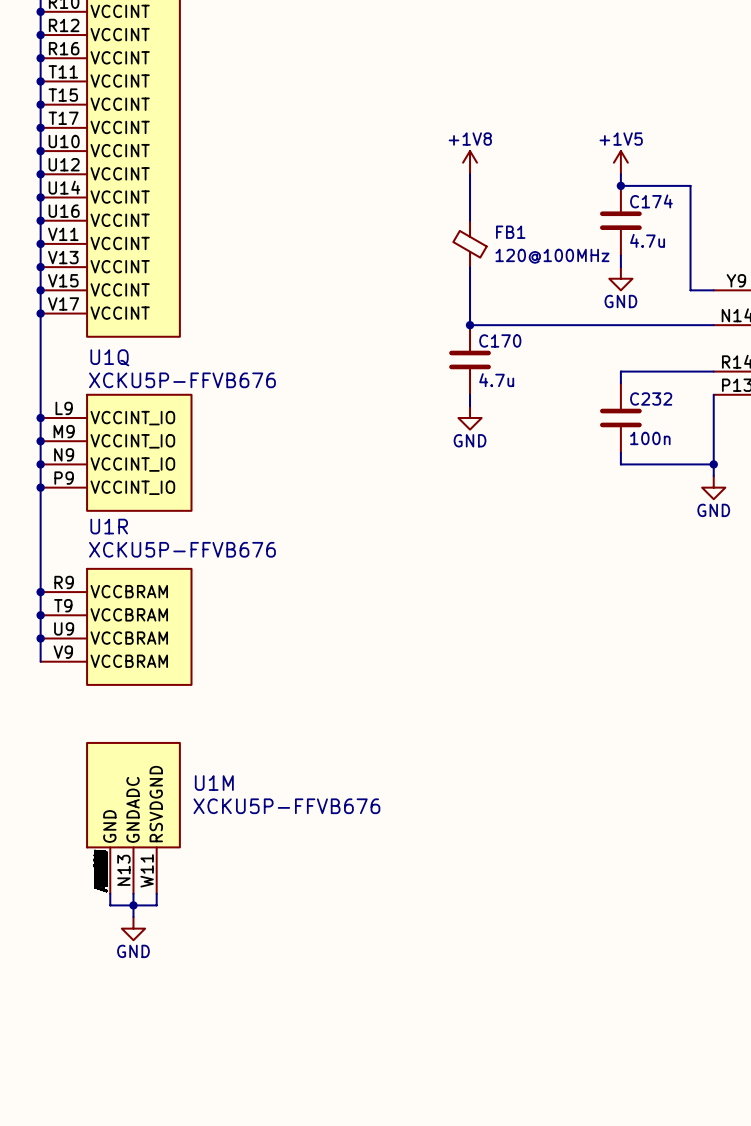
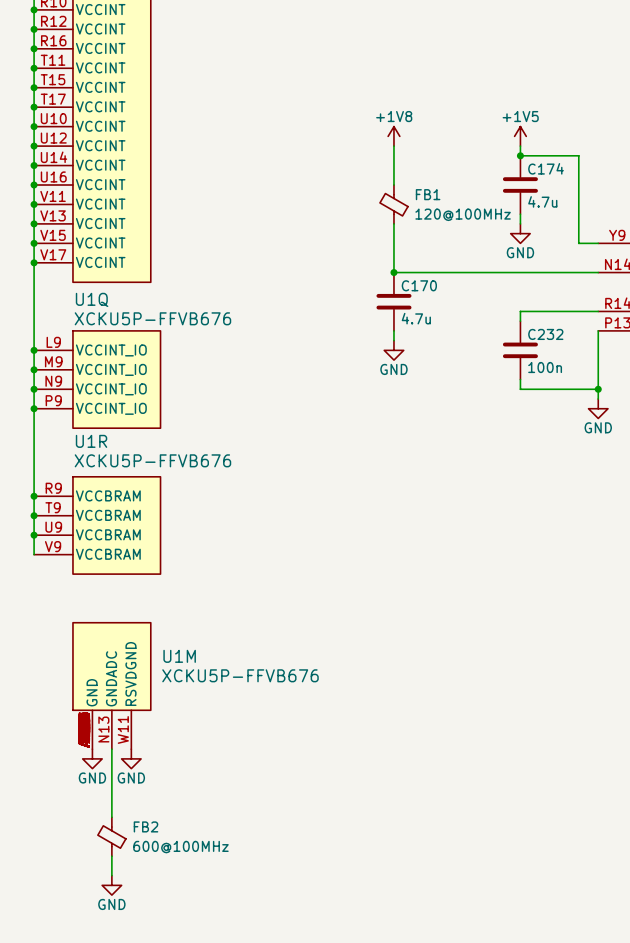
power symbol: none -> GND (92, 758)
junction: (133, 905) -> none
power symbol: none -> GND (131, 758)
wire: none -> (111, 768) (111, 817)
power symbol: GND (133, 928) -> none
FB2: none -> 600@100MHz (111, 836)
wire: none -> (111, 856) (111, 875)
power symbol: none -> GND (111, 885)

